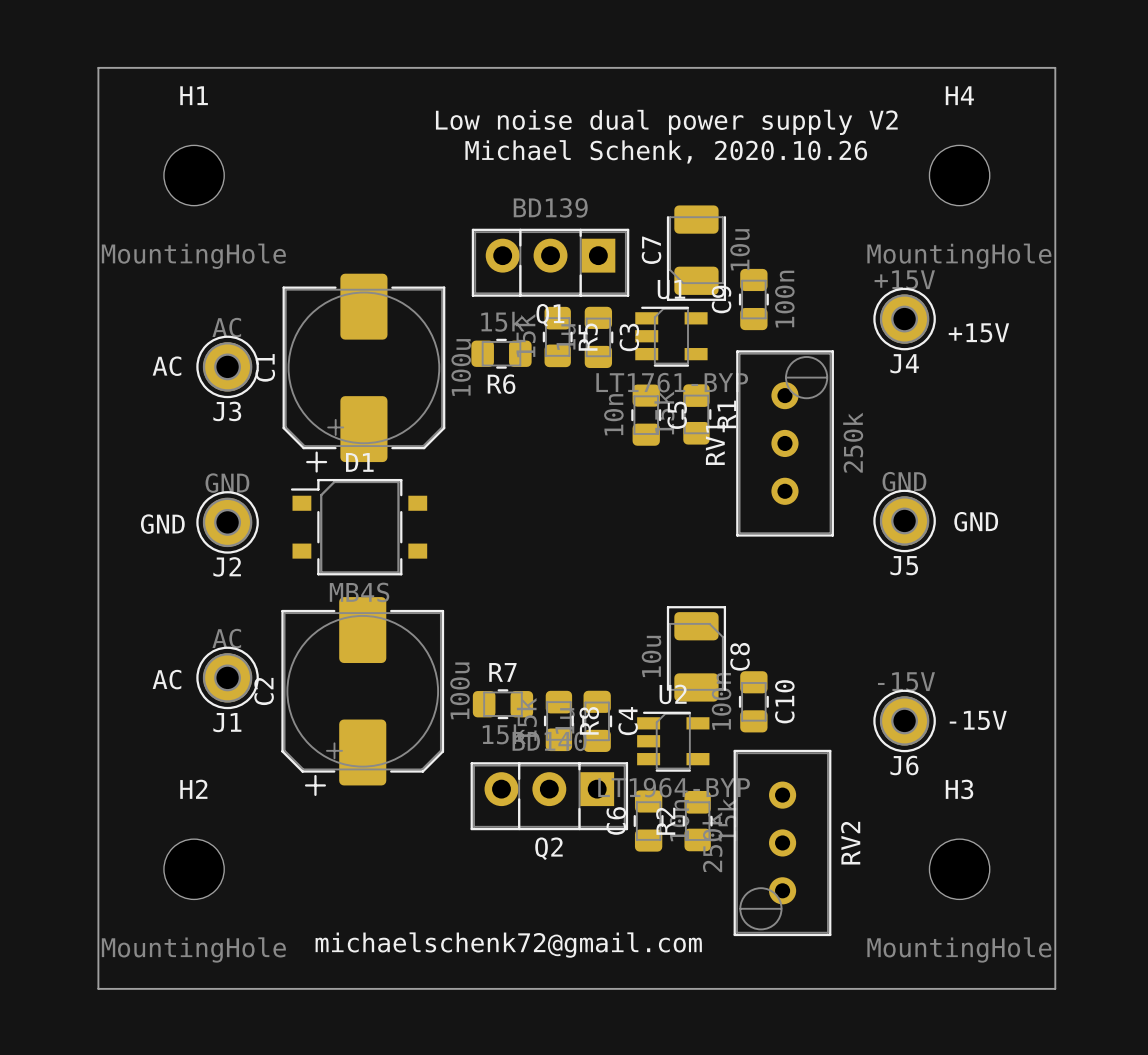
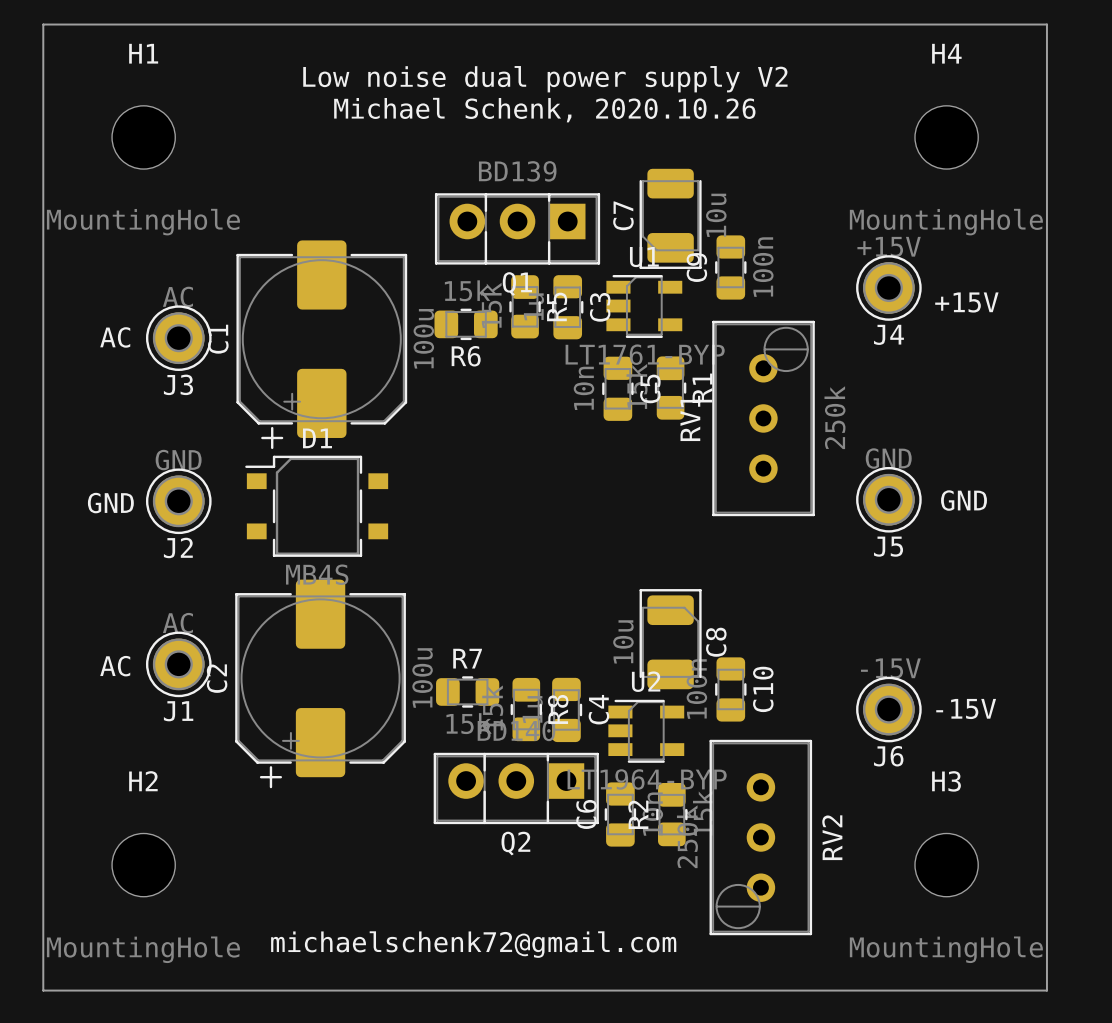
text position: Low noise dual power supply V2 (666, 122) -> Low noise dual power supply V2 (545, 79)
text position: Michael Schenk, 2020.10.26 (666, 151) -> Michael Schenk, 2020.10.26 (544, 110)

